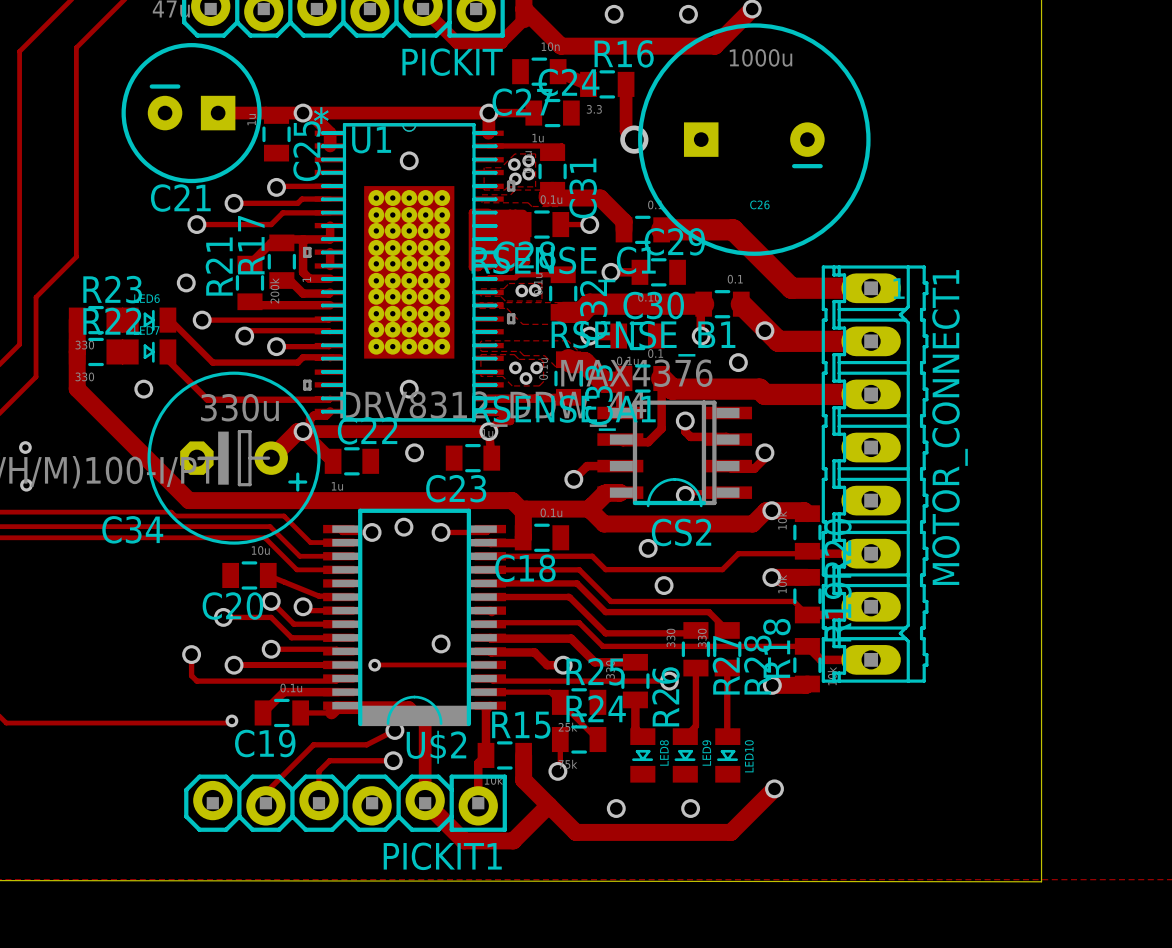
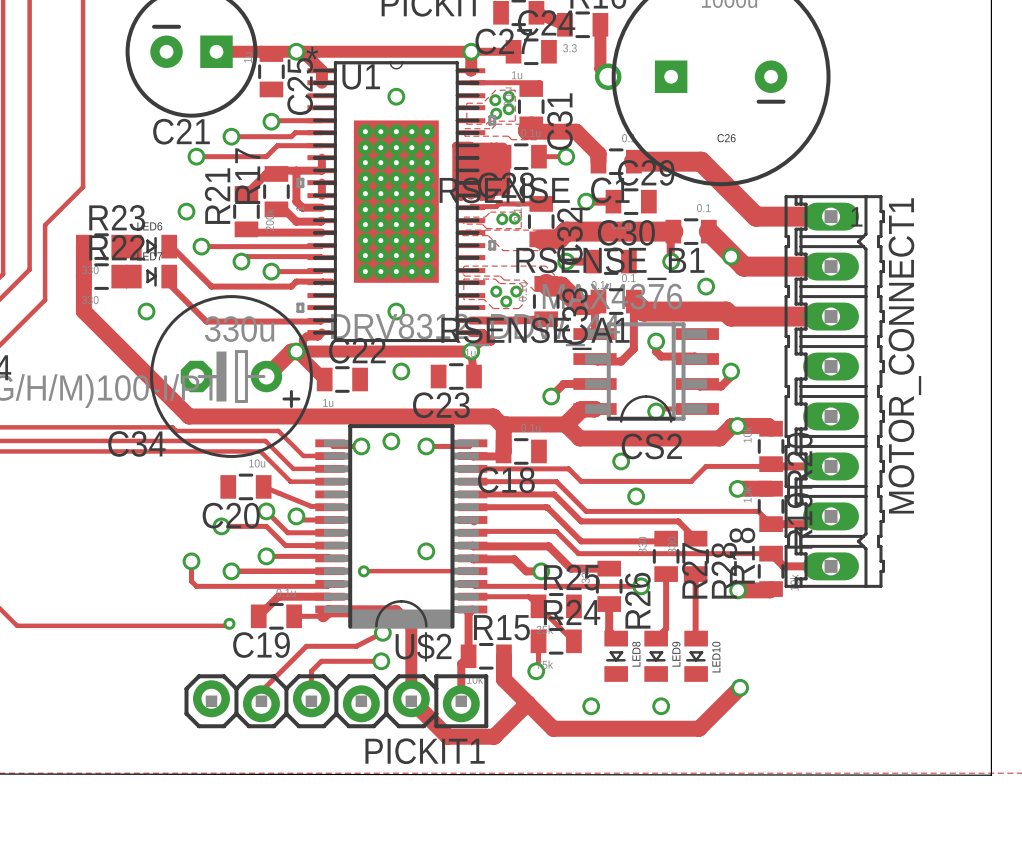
via: (25, 447) -> none
via: (26, 485) -> none

